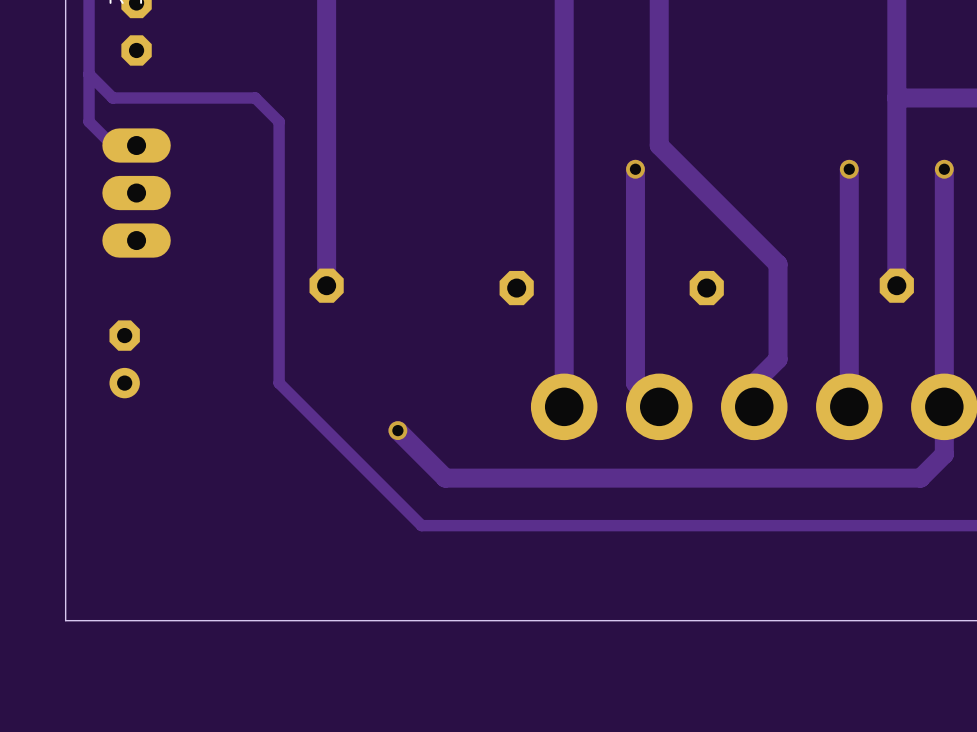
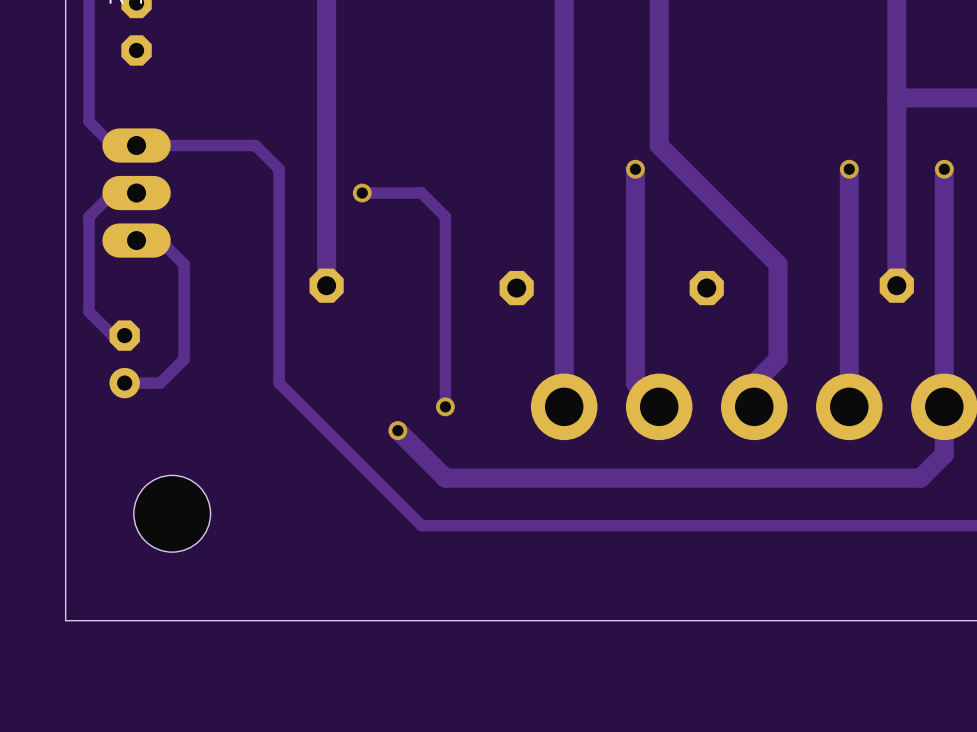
track: (89, 74) (112, 97) (255, 97) (279, 121) (279, 169) -> (136, 145) (255, 145) (279, 169)
track: none -> (136, 193) (112, 193) (89, 216) (89, 311) (112, 335) (124, 335)
track: none -> (362, 193) (421, 193) (445, 216) (445, 406)
via: none -> (362, 193)
track: none -> (136, 240) (160, 240) (184, 264) (184, 359) (160, 383) (124, 383)
via: none -> (445, 406)
part: none -> (172, 513)

